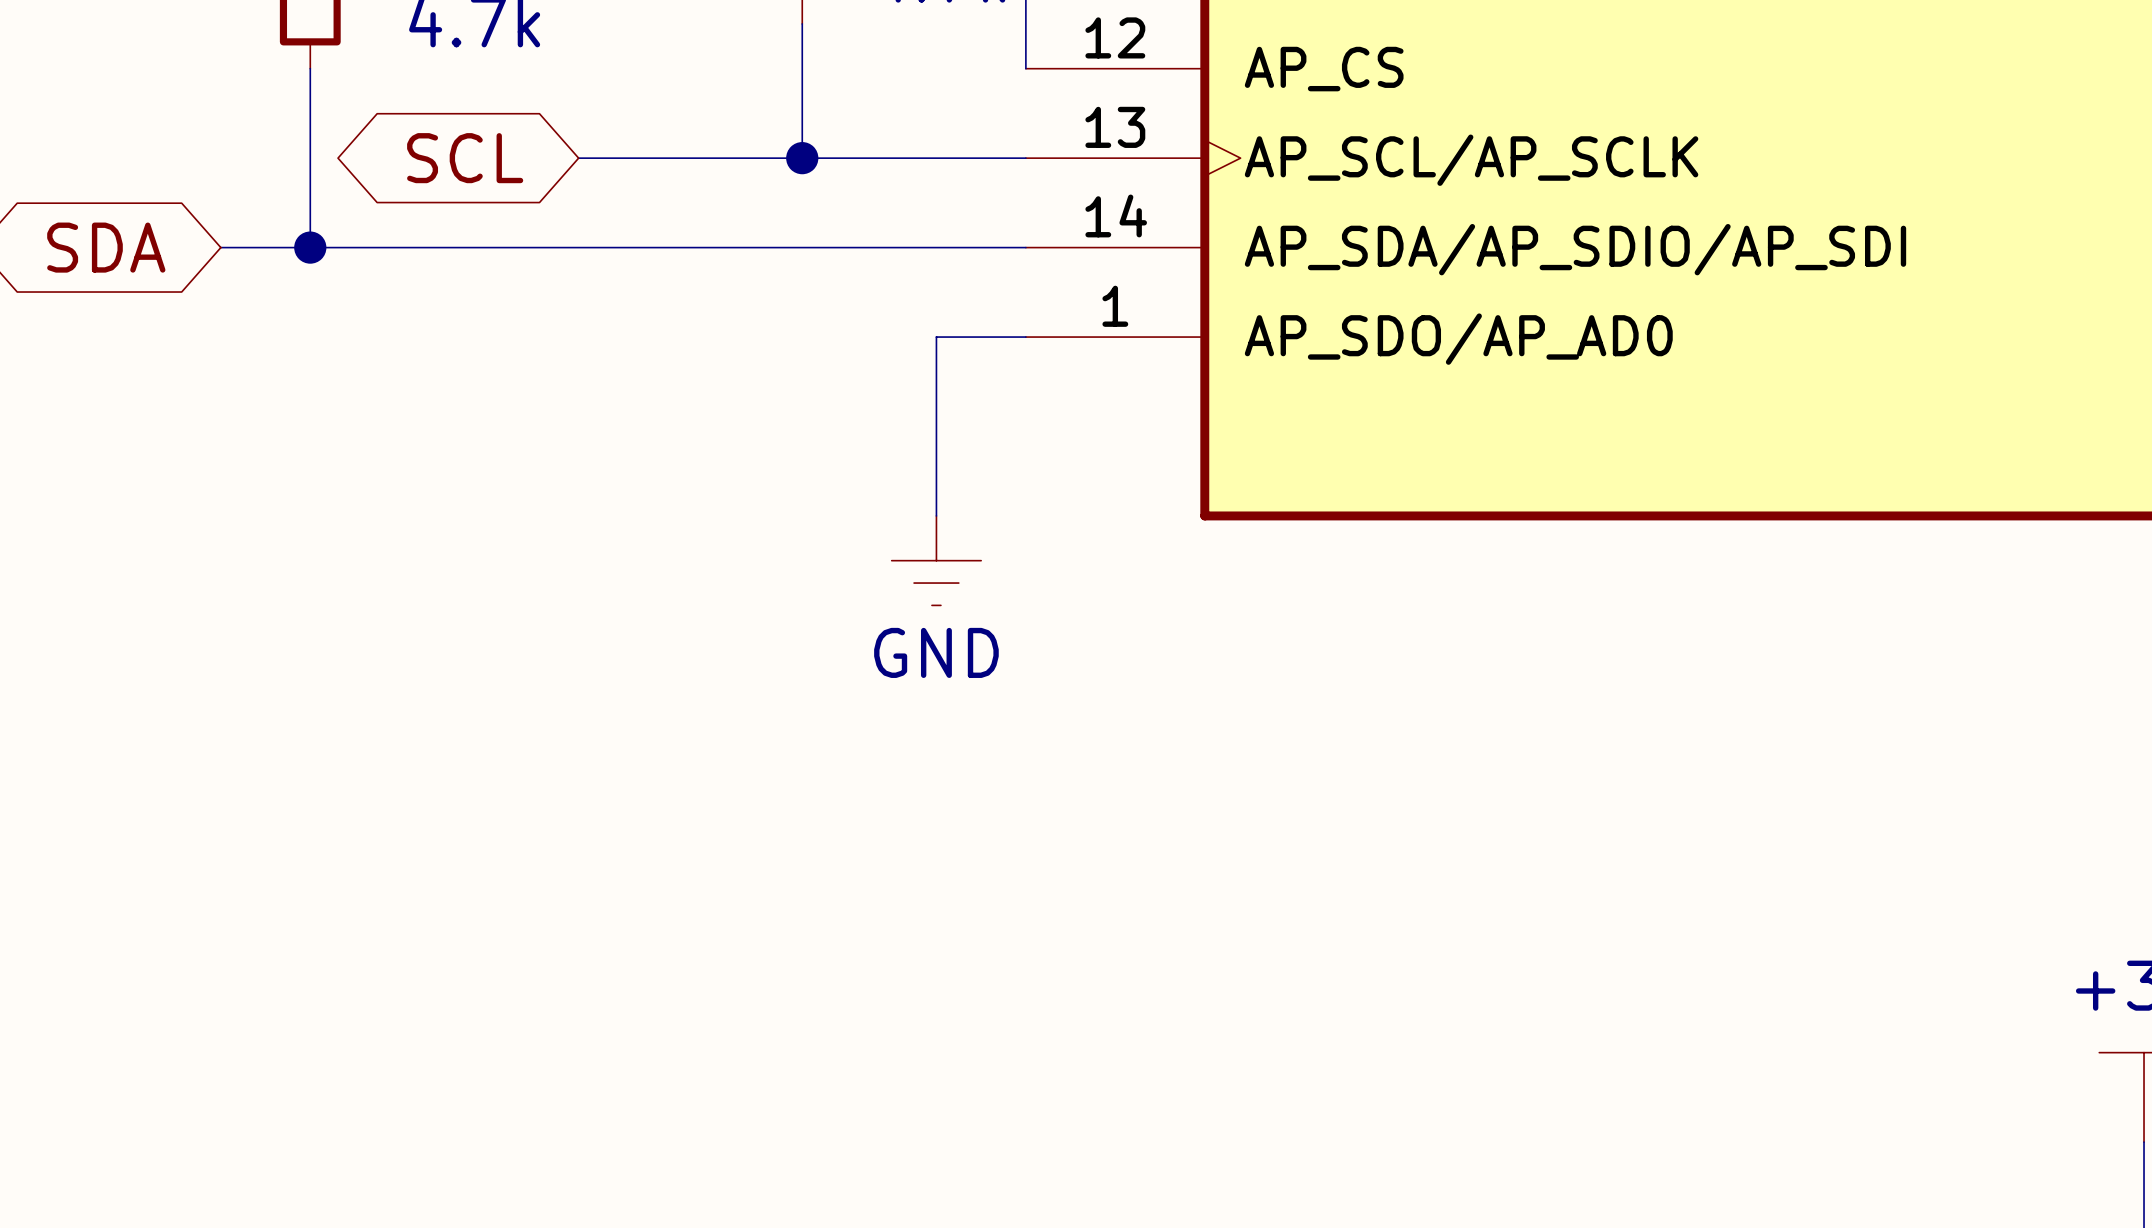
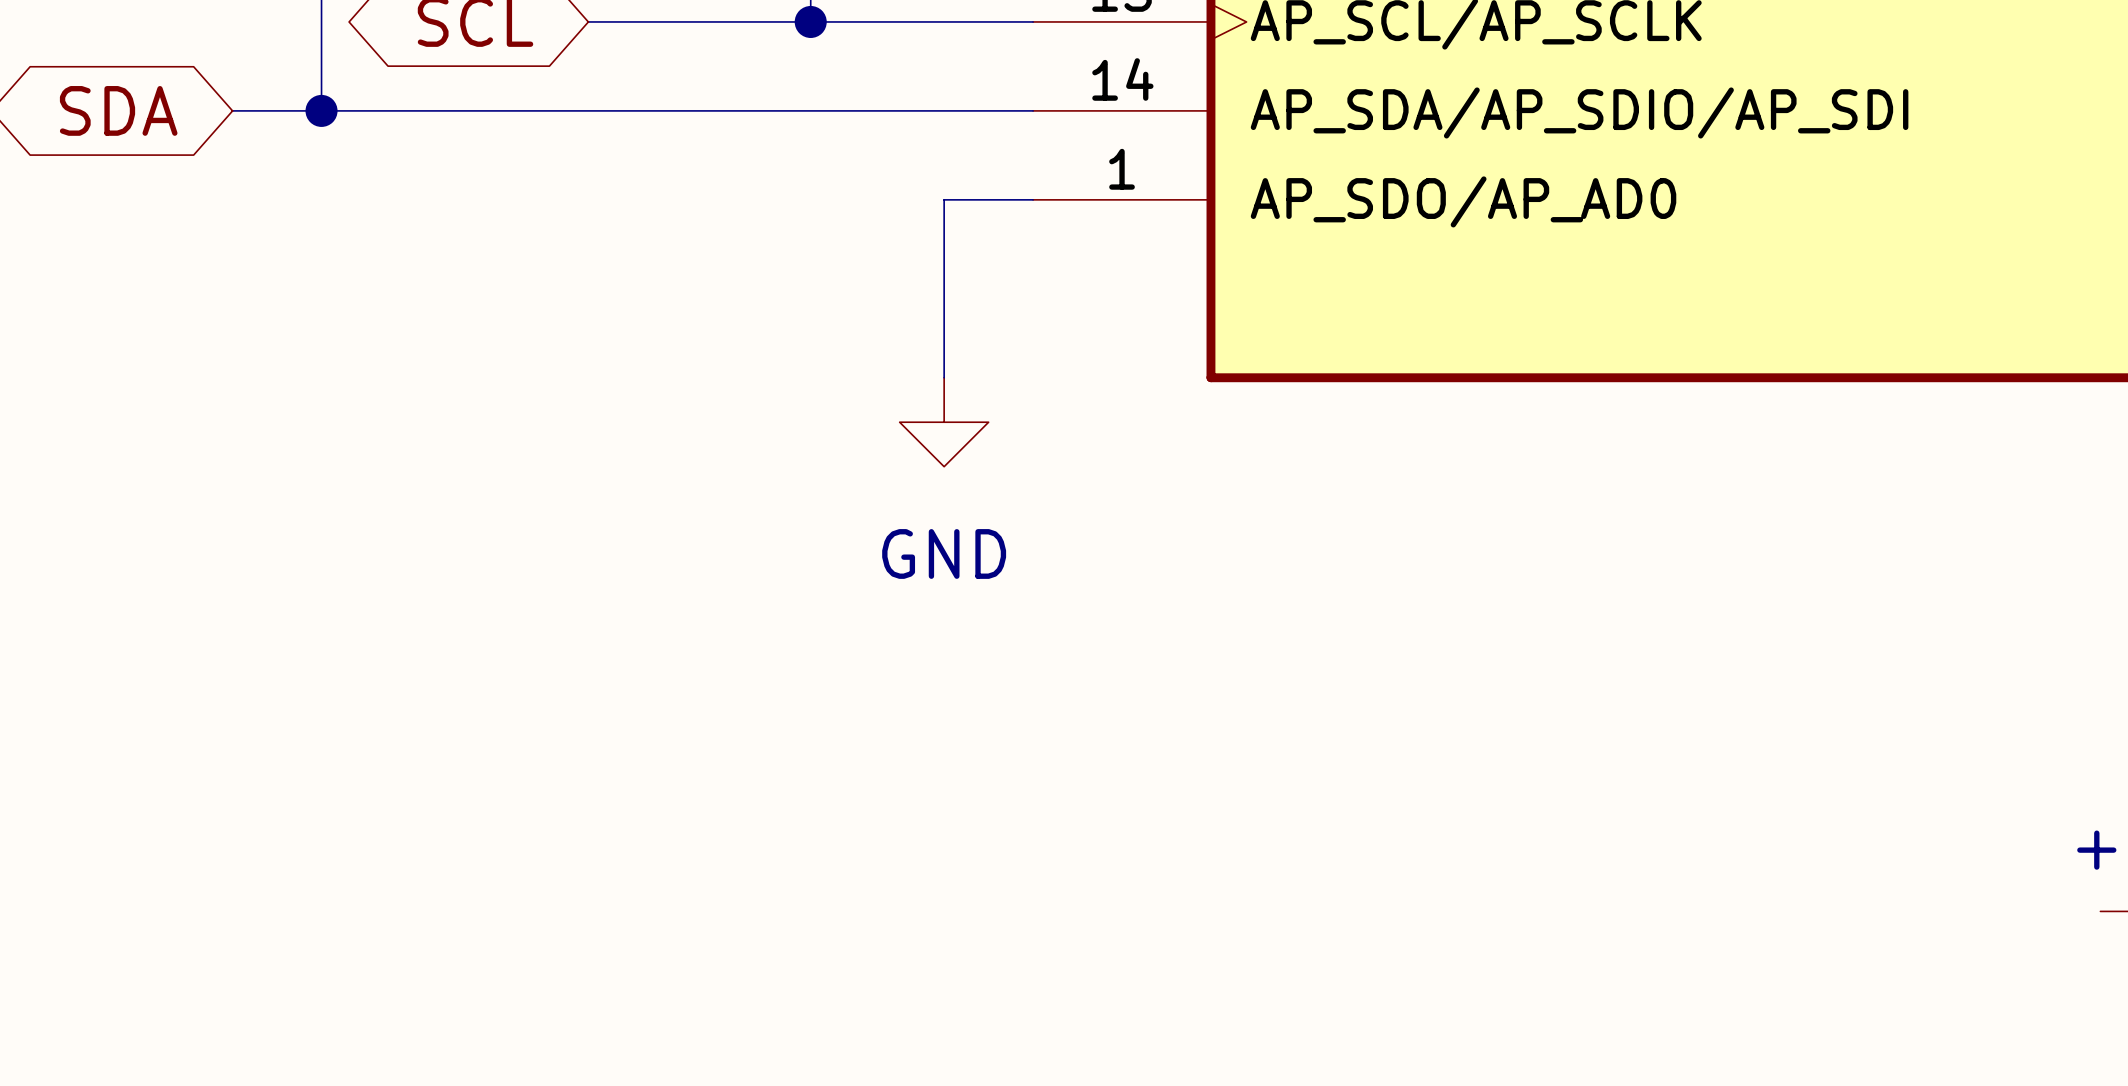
power symbol shape: [891, 515, 982, 606] -> [899, 377, 989, 467]
power symbol text position: GND (936, 652) -> GND (944, 553)

